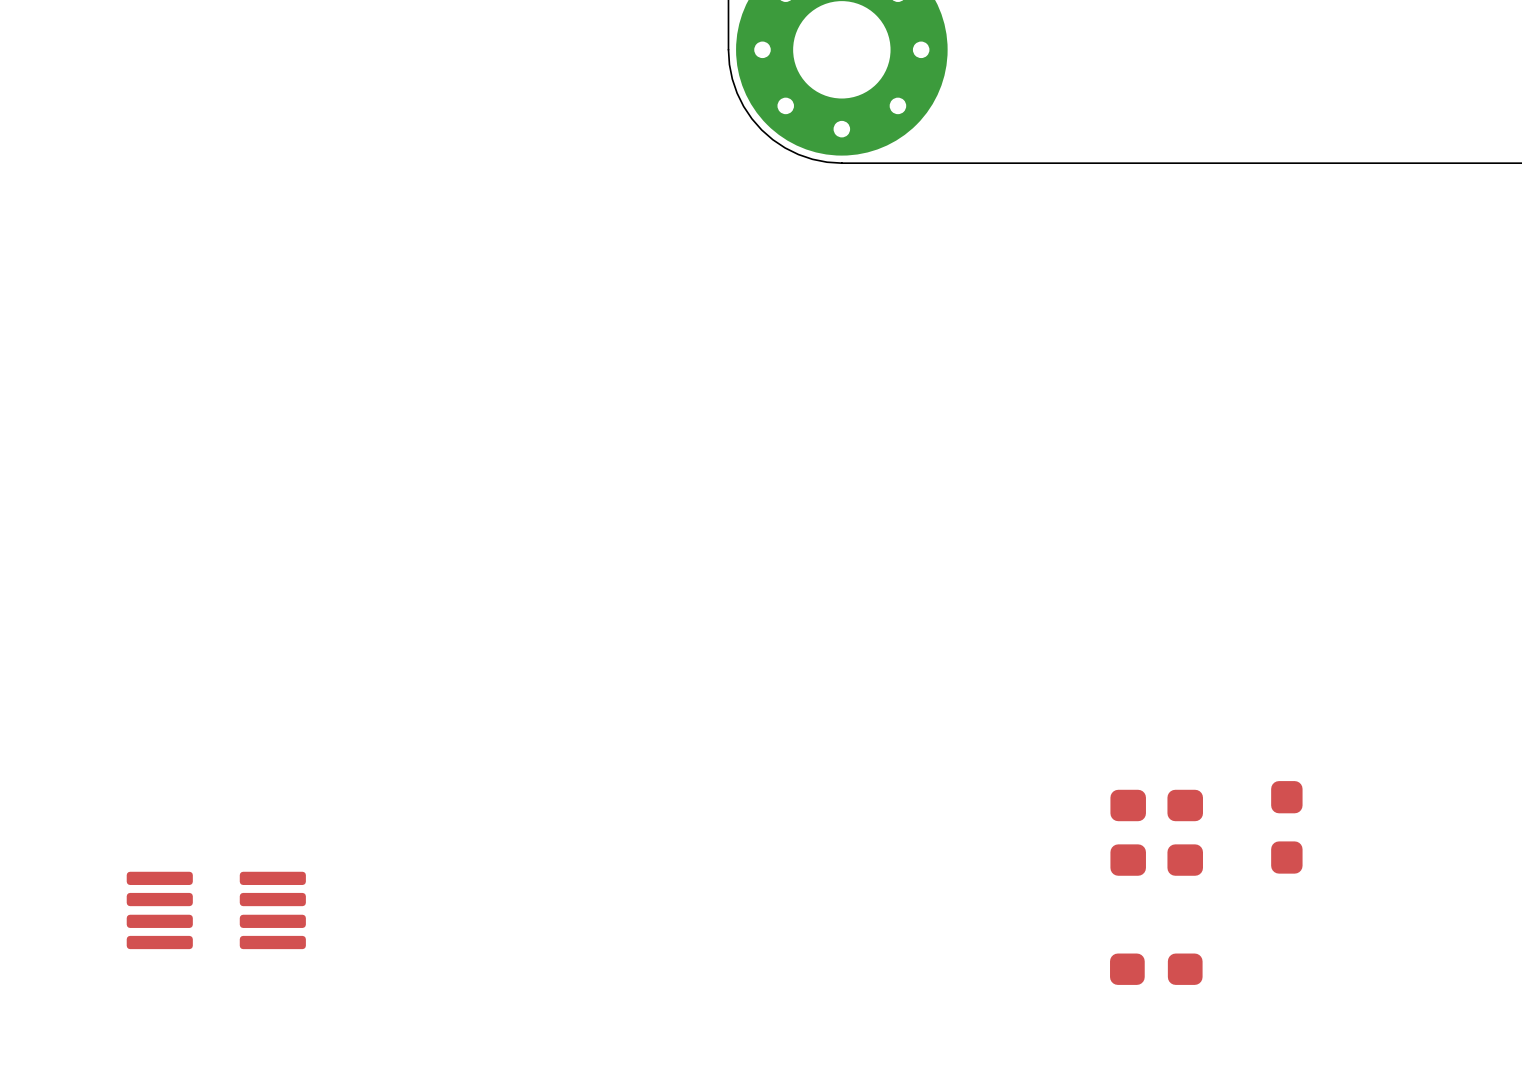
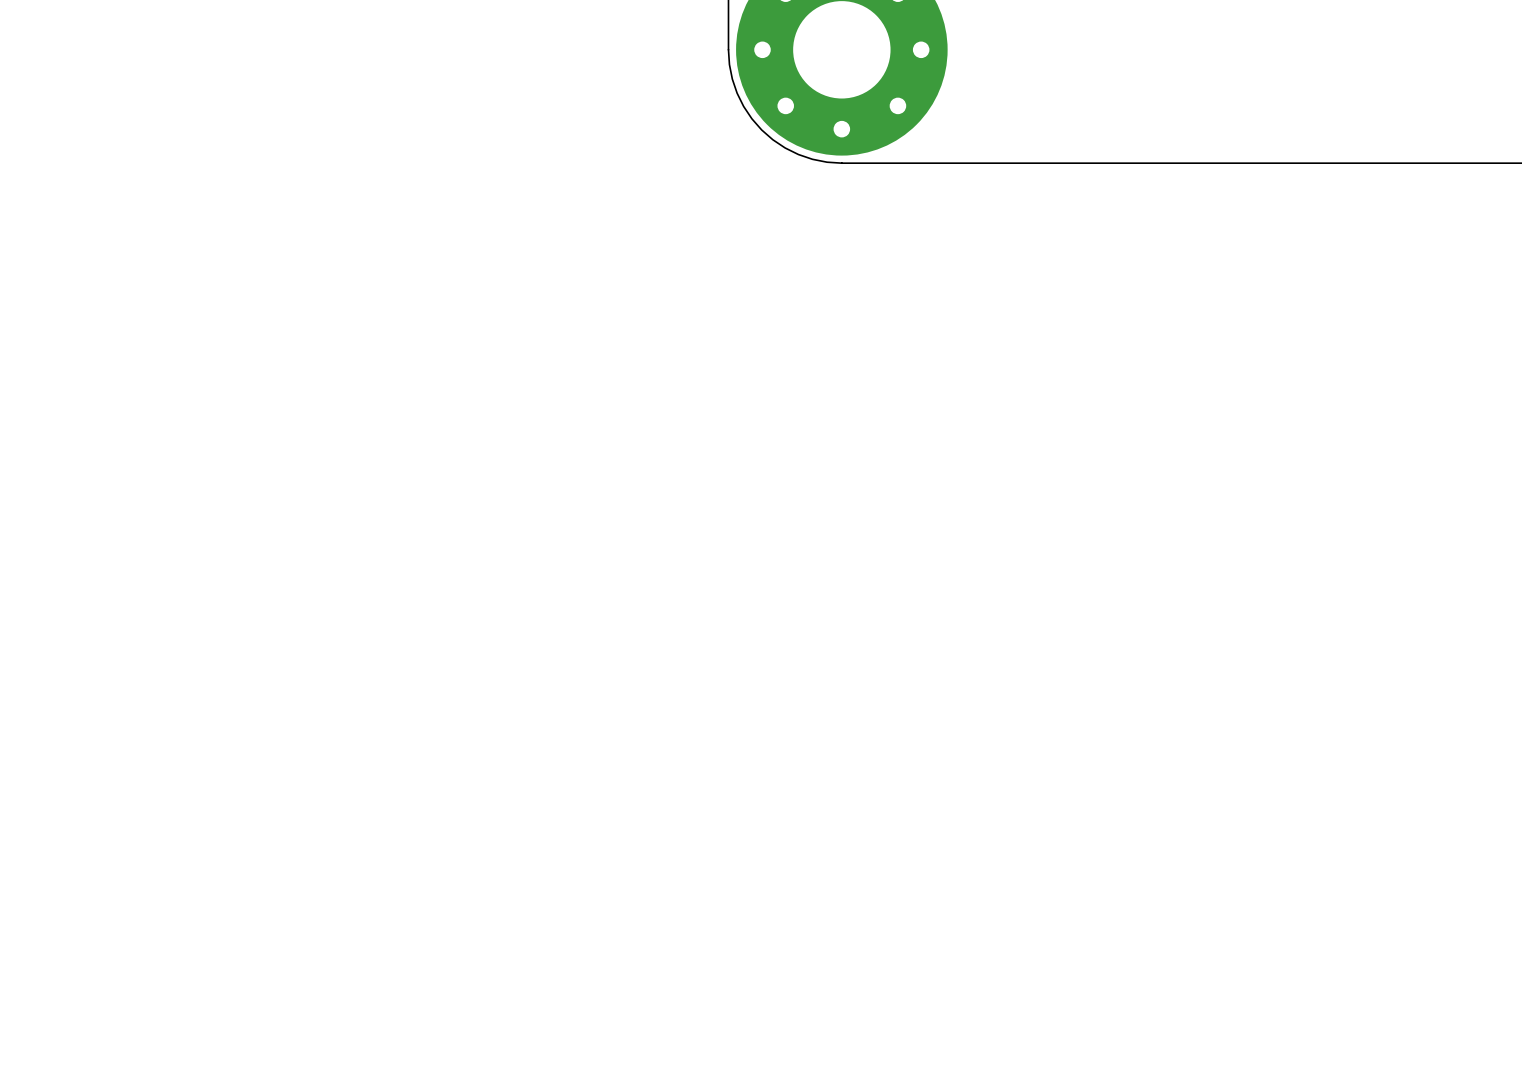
part: (1156, 805) -> none
part: (1286, 827) -> none
part: (1156, 860) -> none
part: (216, 910) -> none
part: (1156, 969) -> none

